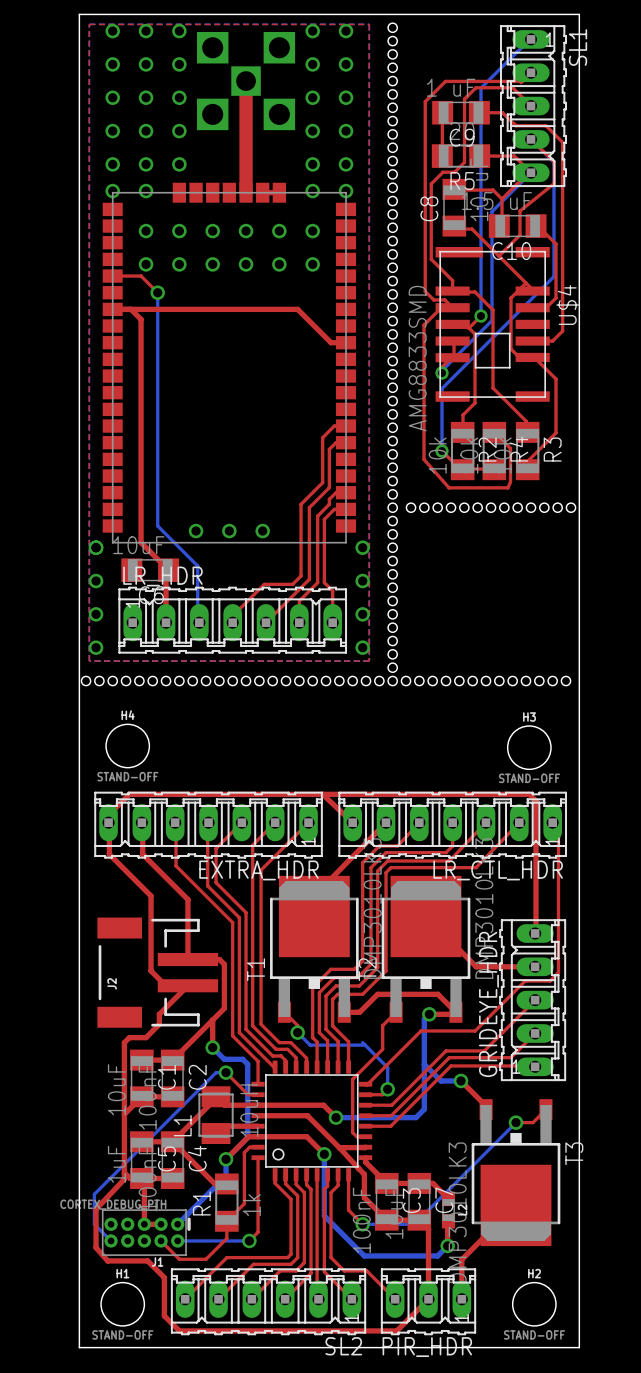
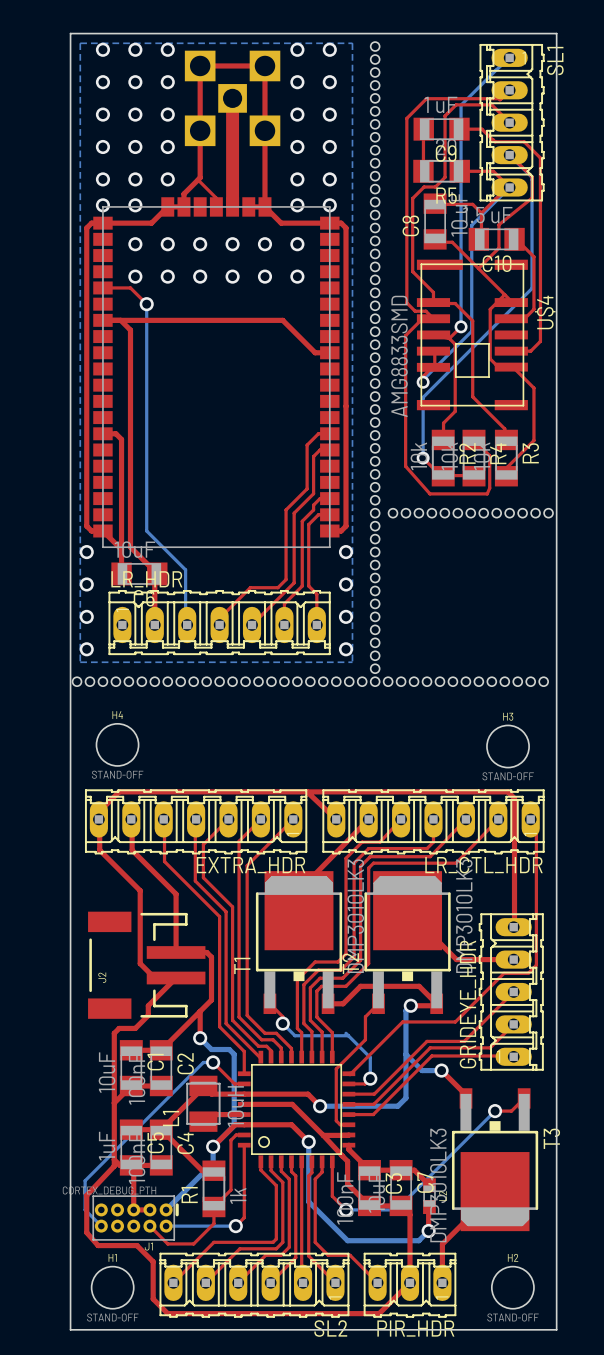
top zone outline: (89, 24) (369, 24) (369, 661) (89, 661) (89, 24) -> none
top track: none -> (198, 179) (216, 198) (216, 206)
top track: none -> (102, 433) (115, 433) (121, 439) (121, 573)
top track: none -> (329, 531) (341, 531) (346, 526) (346, 228) (341, 223) (281, 223) (264, 206) (264, 65) (200, 65) (200, 177) (183, 193) (183, 206) (167, 206) (151, 223) (91, 223) (86, 228) (86, 526) (91, 531) (102, 531) (121, 549)
via: (196, 531) -> none
via: (229, 531) -> none
via: (262, 531) -> none

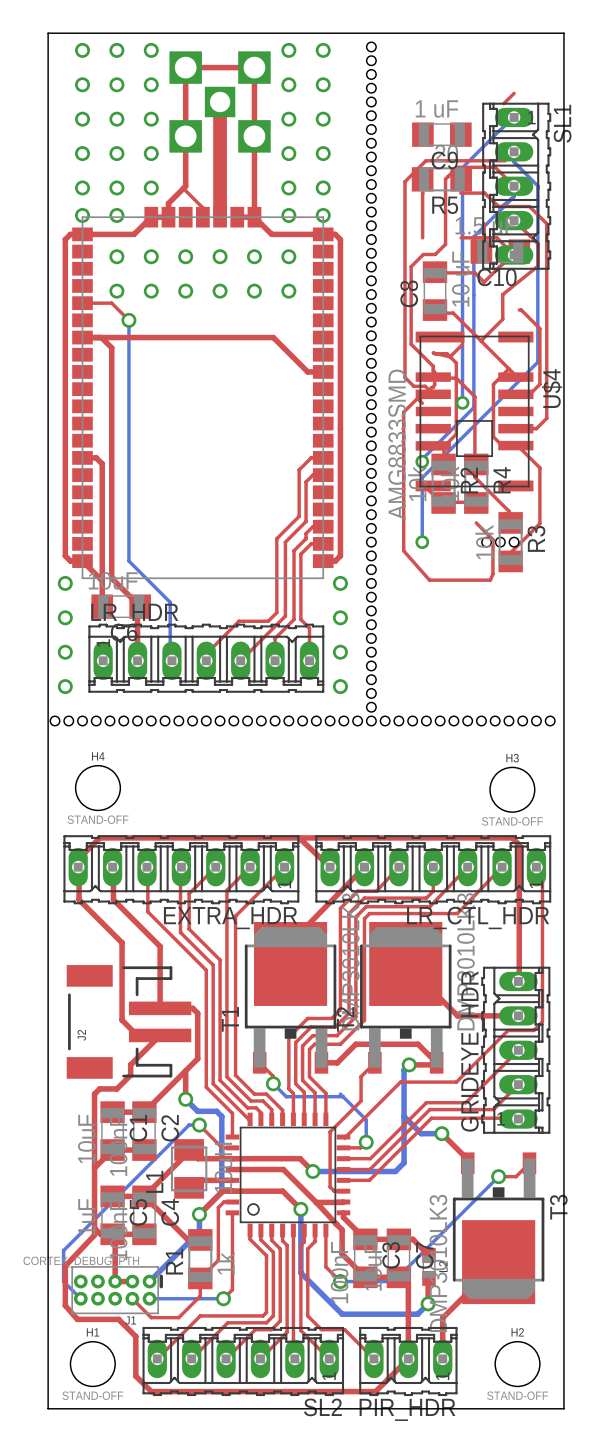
bottom zone outline: (80, 43) (352, 43) (352, 662) (80, 662) (80, 43) -> none
bottom track: (509, 57) (461, 105) (461, 160) -> (514, 117) (462, 167)
top track: (501, 98) (426, 98) (406, 118) (406, 173) -> (505, 160) (425, 160) (404, 181)
top track: (509, 122) (491, 104) (456, 104) (445, 115) (445, 171) -> (514, 186) (494, 166) (457, 167) (445, 179)
SL1 position: (512, 122) -> (516, 186)
top track: (423, 129) (423, 171) -> (422, 193) (422, 237)
top track: (459, 129) (481, 129) (495, 141) (524, 141) (540, 158) (540, 213) -> (460, 193) (484, 193) (498, 206) (529, 206) (546, 223)
top track: (509, 155) (532, 177) (532, 197) (498, 224) (498, 248) (478, 268) -> (514, 220) (538, 244) (538, 266) (502, 294) (502, 319) (481, 340)
top track: (459, 171) (493, 171) (509, 187) (481, 213) (472, 204) (435, 203) -> (461, 237) (496, 237) (514, 255) (484, 282) (474, 272) (435, 272)
top track: (445, 177) (435, 187) (424, 187) (412, 198) (412, 253) -> (445, 185) (445, 244) (435, 254) (423, 254) (411, 266)
C8 position: (435, 221) -> (435, 291)
top track: (435, 239) (437, 242) (452, 242) (511, 302) -> (435, 310) (437, 313) (453, 313) (515, 377)
top track: (514, 239) (533, 256) (533, 309) (525, 318) (511, 318) -> (519, 310) (539, 328) (539, 384) (530, 393) (515, 394)
top track: (412, 271) (433, 292) (433, 302) -> (411, 285) (411, 344) (433, 366) (433, 377)
bottom track: (532, 288) (423, 397) (423, 434) -> (537, 303) (537, 362) (422, 477)
top track: (504, 294) (490, 309) (490, 358) (496, 364) (510, 364) (533, 388) (533, 440) (507, 466) (506, 476) -> (508, 368) (493, 384) (493, 436) (499, 443) (515, 443) (539, 467) (539, 523) (512, 551) (510, 561)
top track: (406, 302) (415, 311) (425, 311) (433, 318) -> (404, 319) (404, 377) (413, 386) (425, 386) (433, 394)
top track: (433, 302) (455, 303) (472, 321) (472, 376) -> (433, 377) (456, 378) (474, 396)
top track: (420, 321) (405, 335) (405, 390) -> (419, 396) (403, 412)
bottom track: none -> (462, 344) (462, 402)
via: (461, 326) -> none
bottom track: (471, 331) (423, 379) (423, 382) -> (473, 349) (473, 407) (422, 459)
U$4 position: (472, 334) -> (474, 411)
top track: (540, 341) (530, 351) (511, 351) -> (546, 359) (546, 418) (536, 428) (515, 428)
via: none -> (462, 402)
via: (423, 382) -> none
top track: (472, 396) (504, 428) (506, 439) -> (474, 418) (474, 477) (508, 511) (510, 522)
bottom track: (423, 437) (423, 452) -> none
top track: (474, 439) (489, 455) (489, 488) (487, 493) (429, 493) (405, 466) -> (476, 522) (492, 539) (492, 574) (490, 580) (429, 580) (403, 550) (403, 492)
bottom track: none -> (422, 483) (422, 542)
via position: (423, 458) -> (422, 461)
R3 position: (506, 458) -> (510, 542)
hole: (392, 513) -> none
hole: (405, 513) -> none
hole: (418, 513) -> none
via: none -> (422, 542)
hole: (431, 513) -> none
hole: (444, 513) -> none
hole: (457, 513) -> none
hole: (470, 513) -> none
hole: (522, 513) -> none
hole: (535, 513) -> none
hole: (548, 513) -> none

